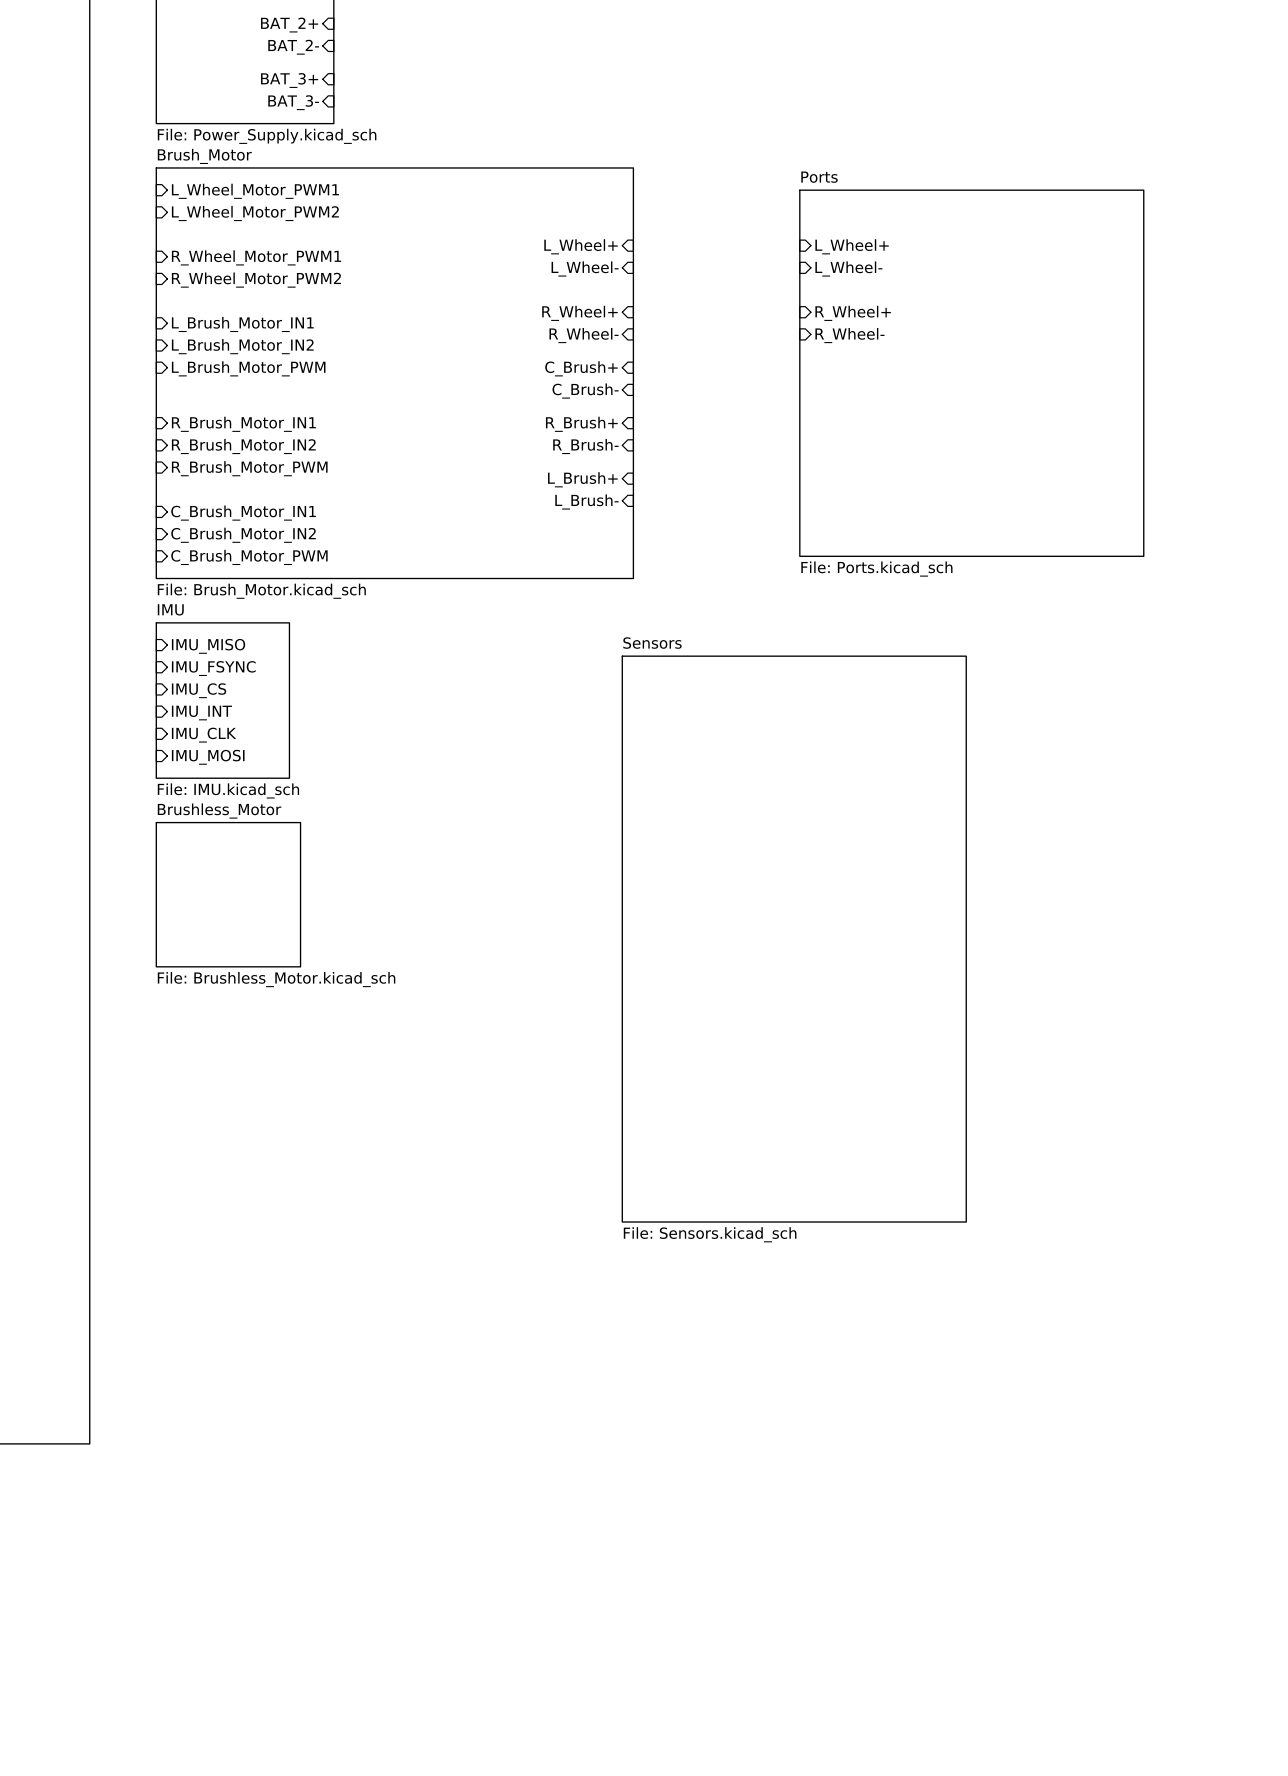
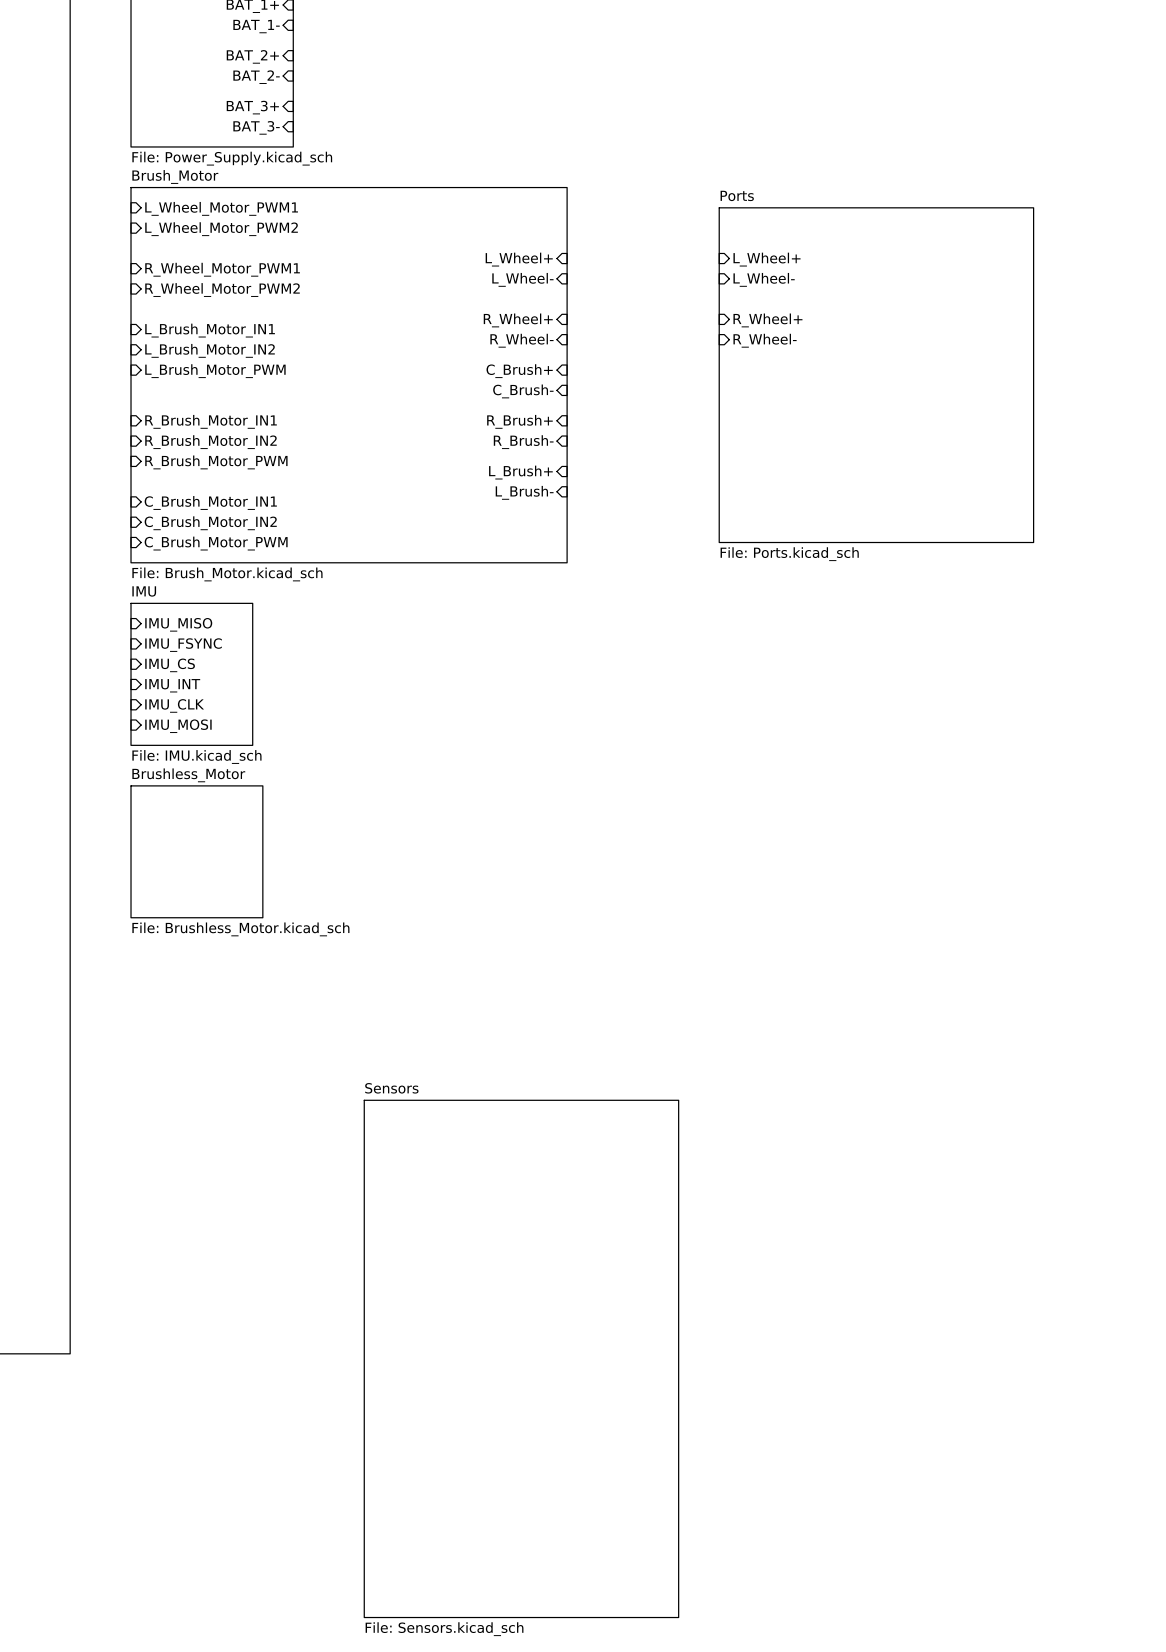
sheet Sensors: File: Sensors.kicad_sch (794, 939) -> none
sheet Sensors: none -> File: Sensors.kicad_sch (521, 1358)

